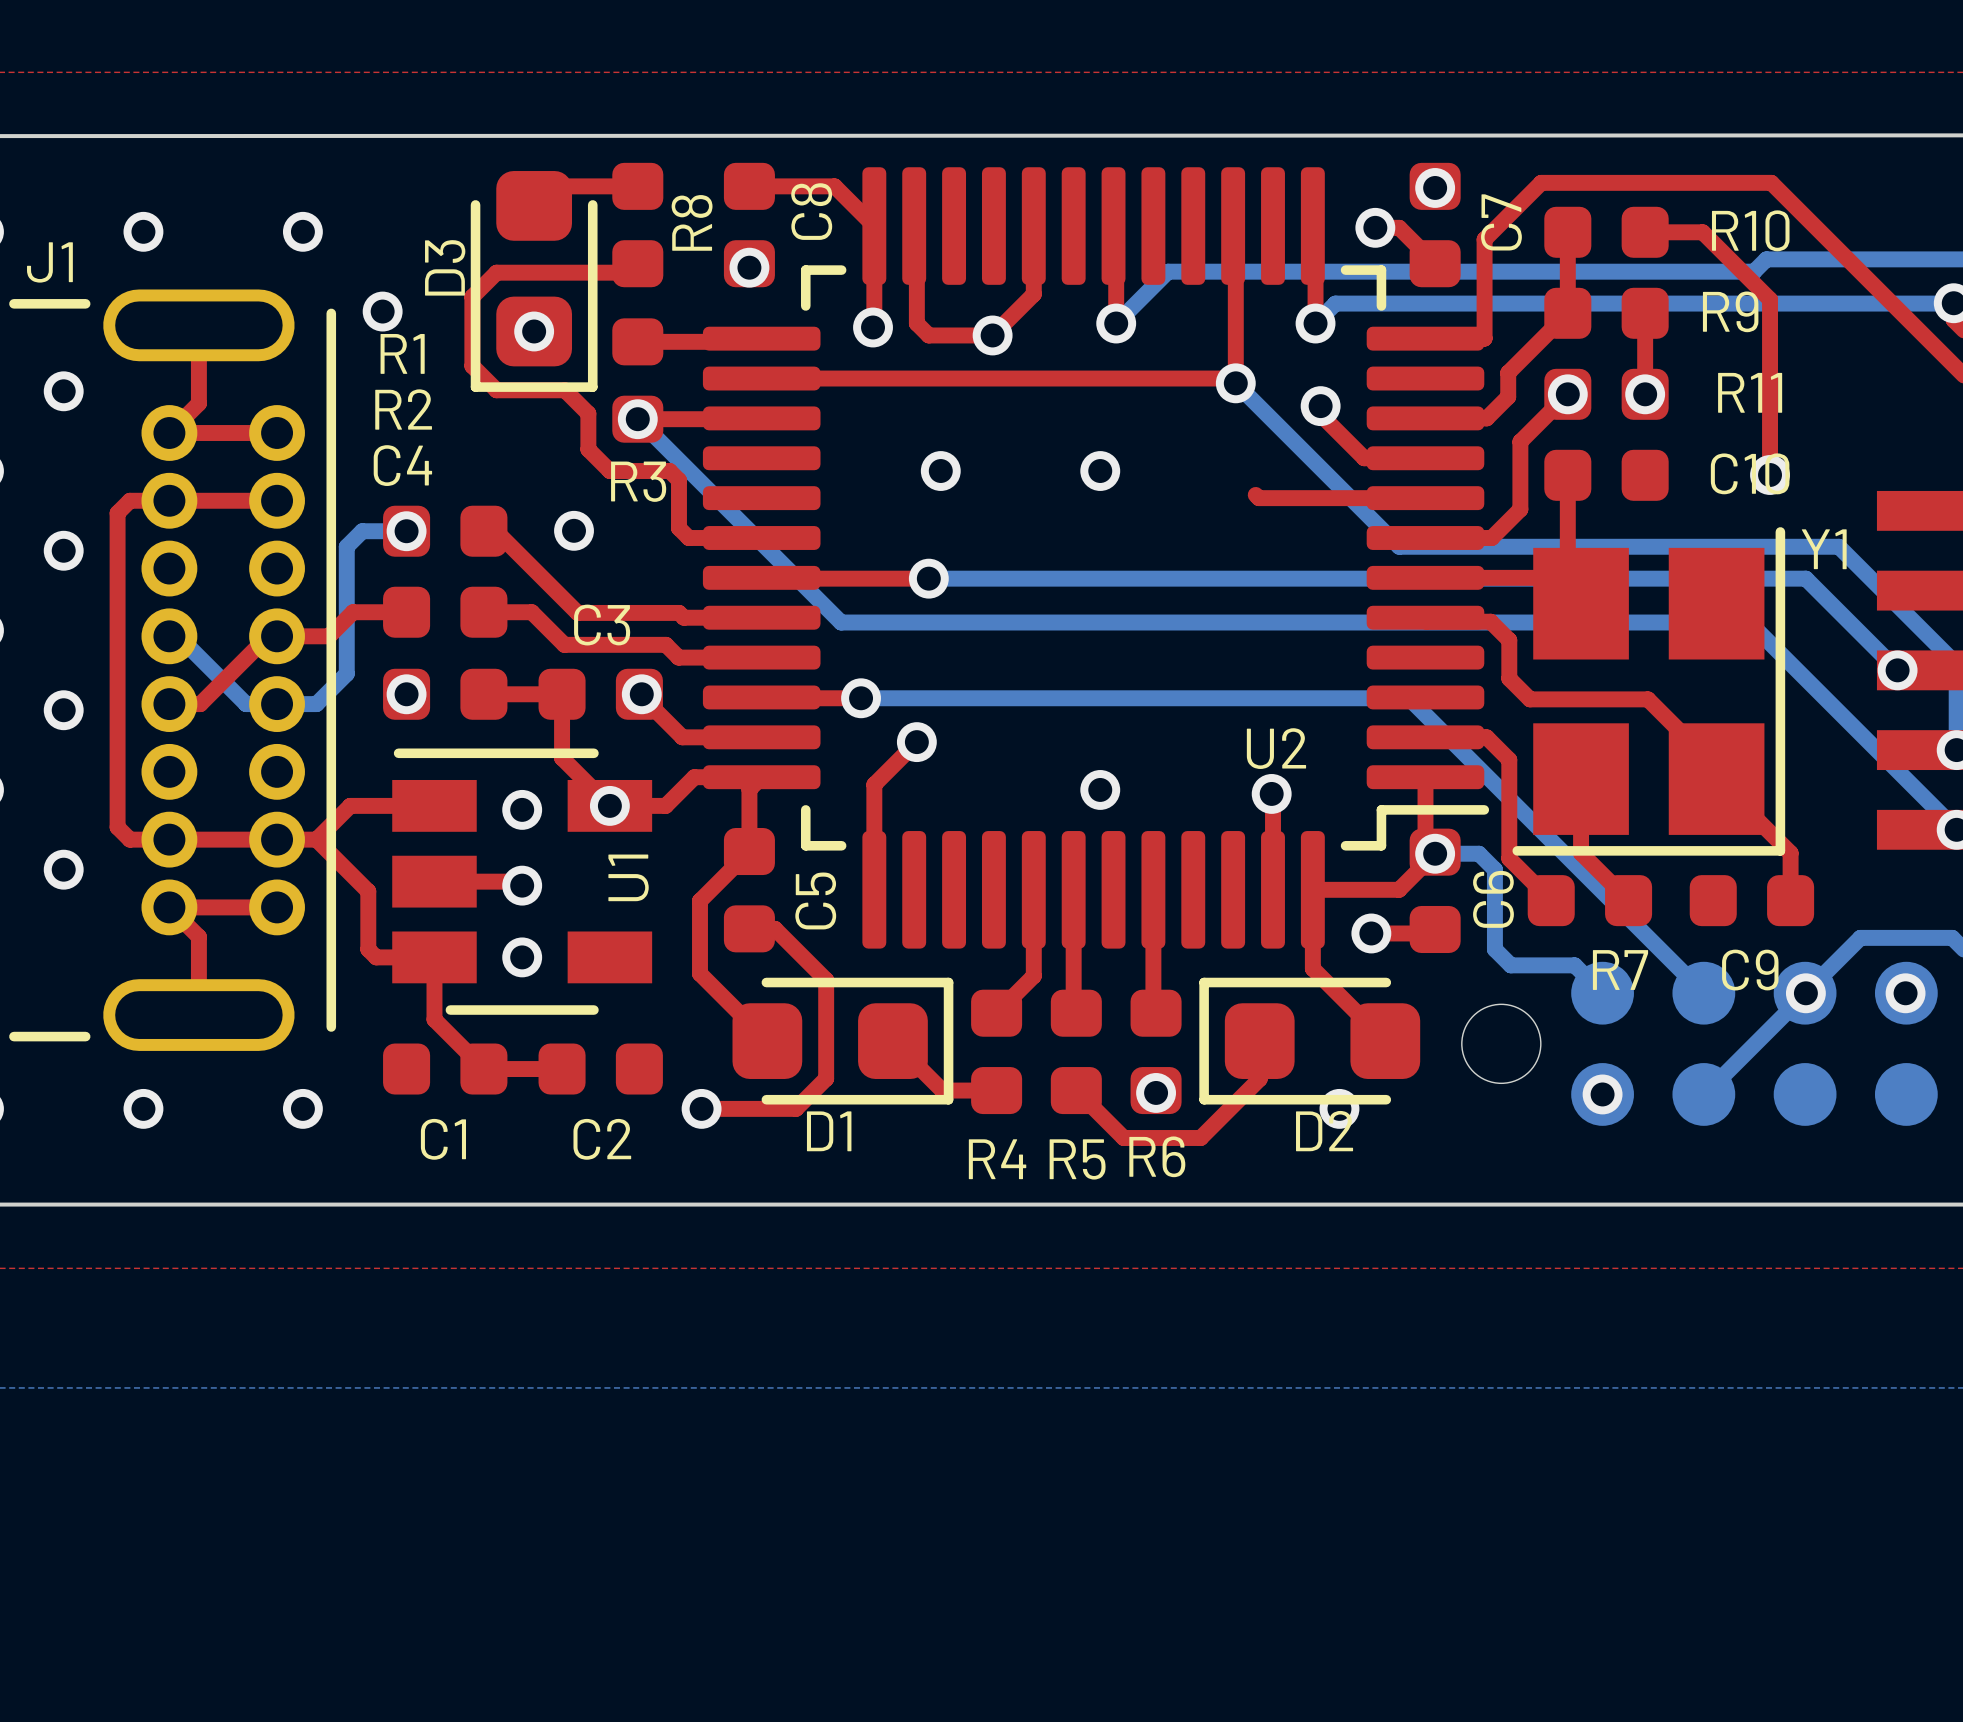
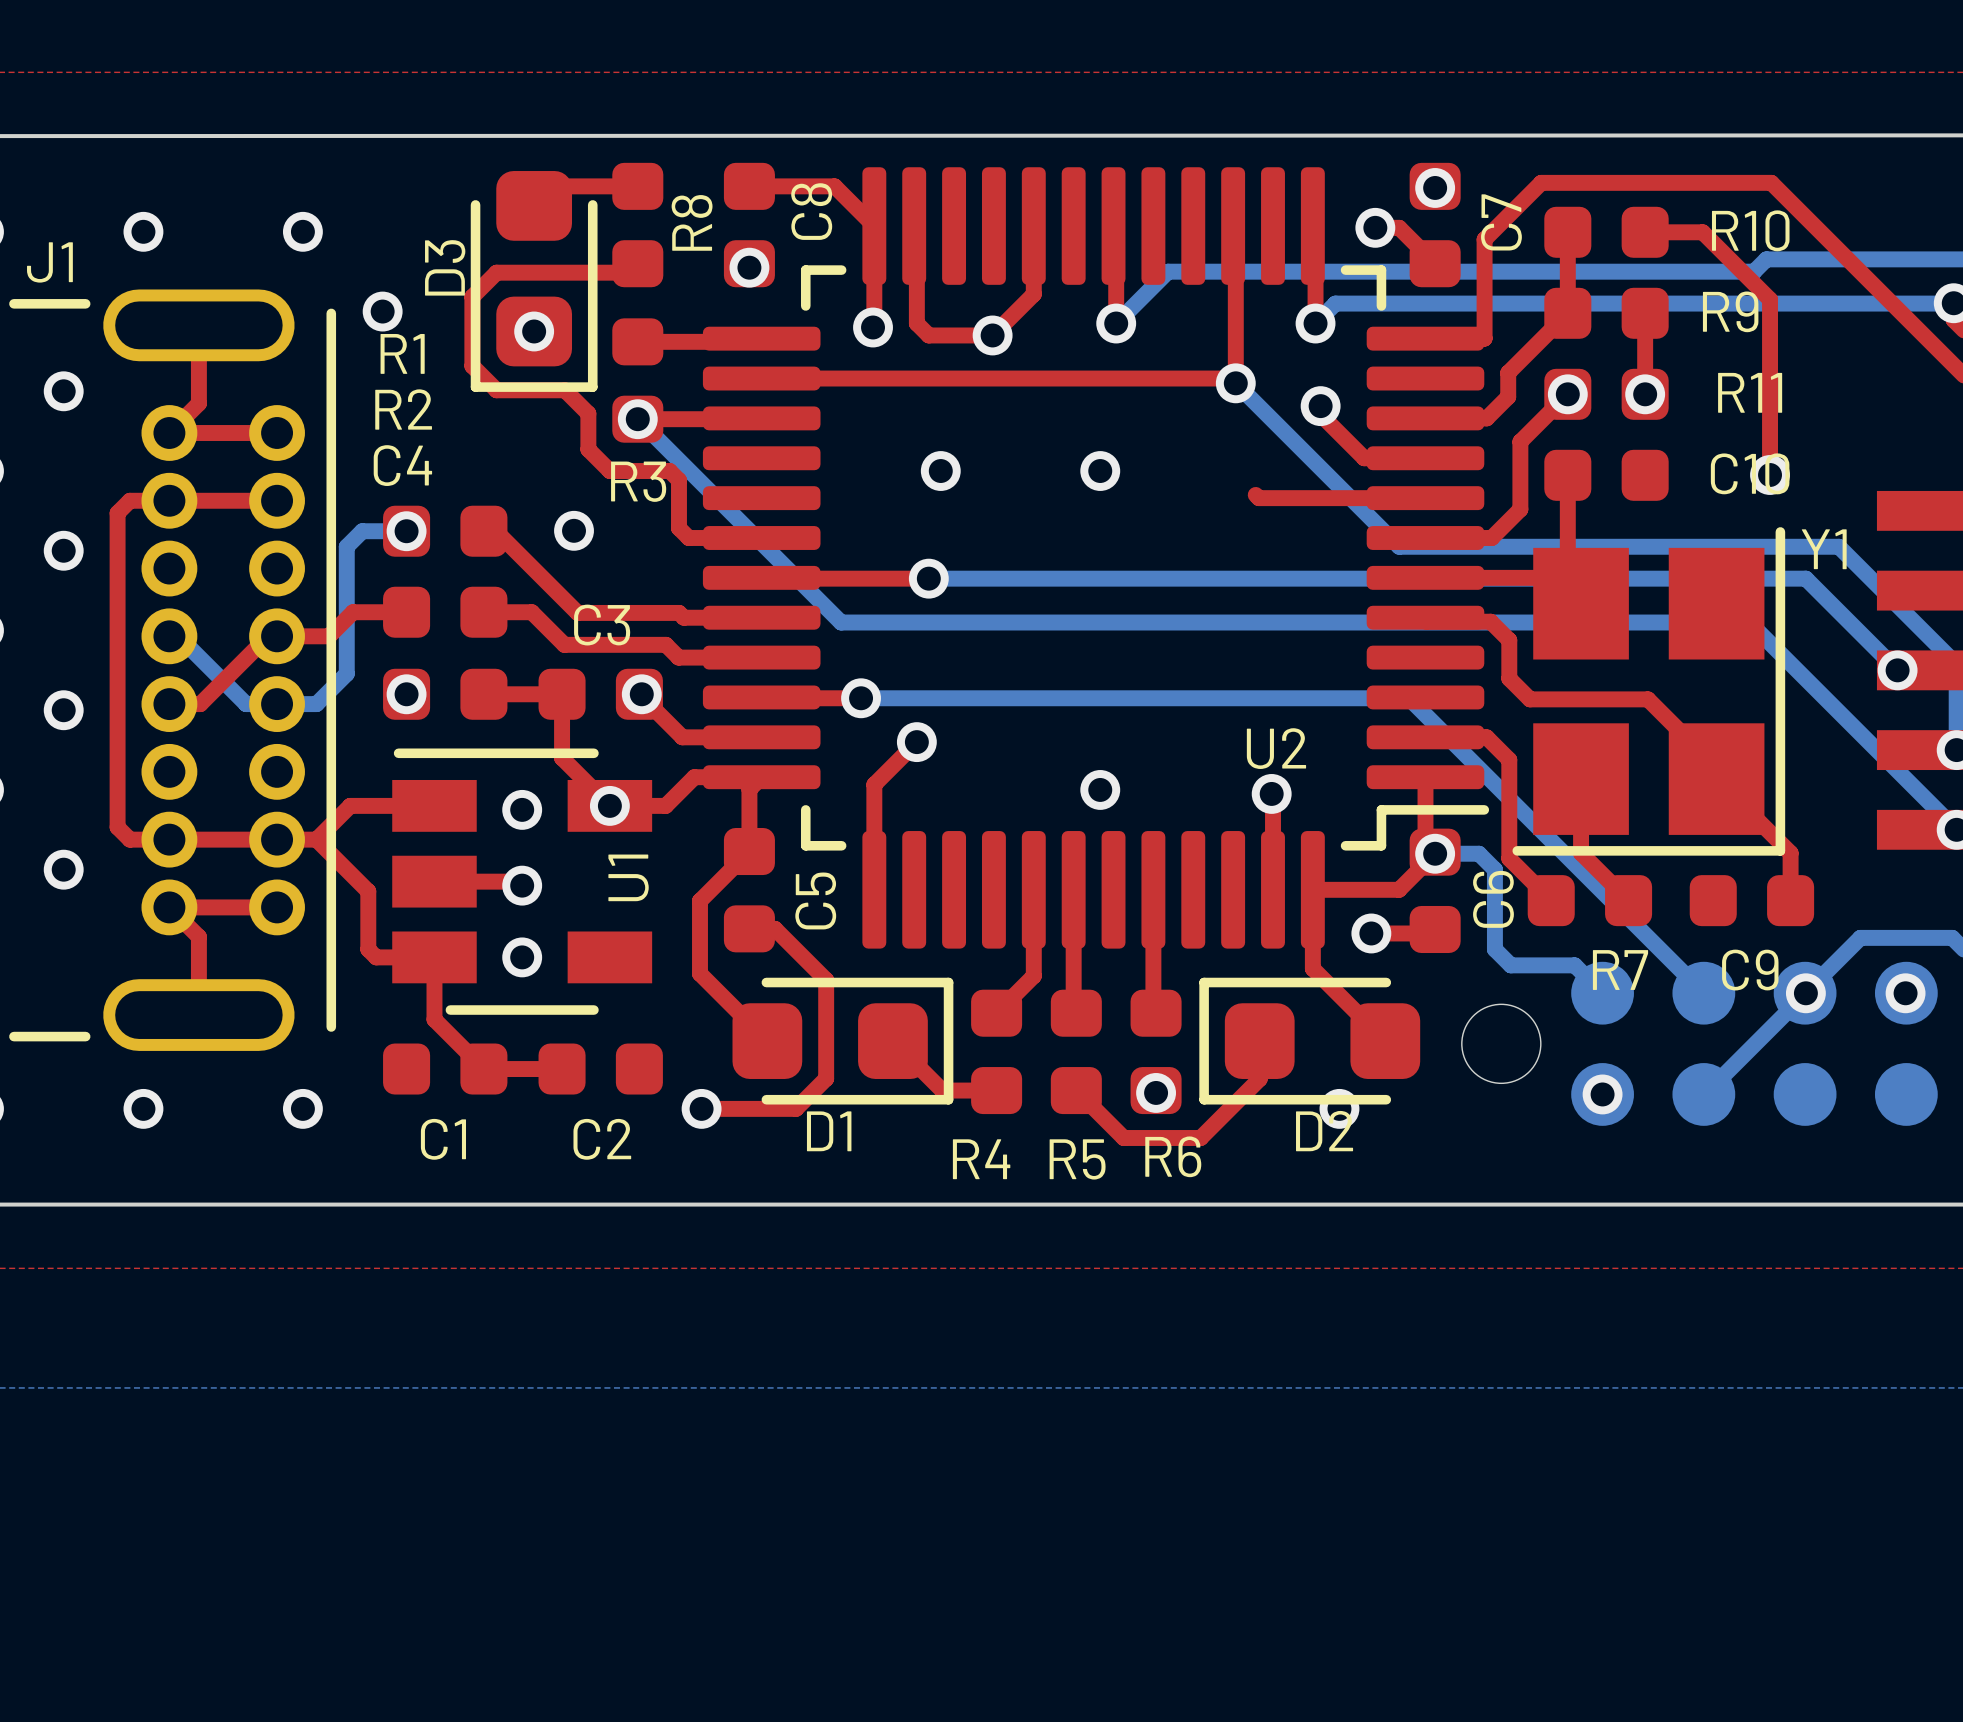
R6 name position: R6 (1157, 1156) -> R6 (1173, 1156)
R4 name position: R4 (997, 1159) -> R4 (981, 1159)

